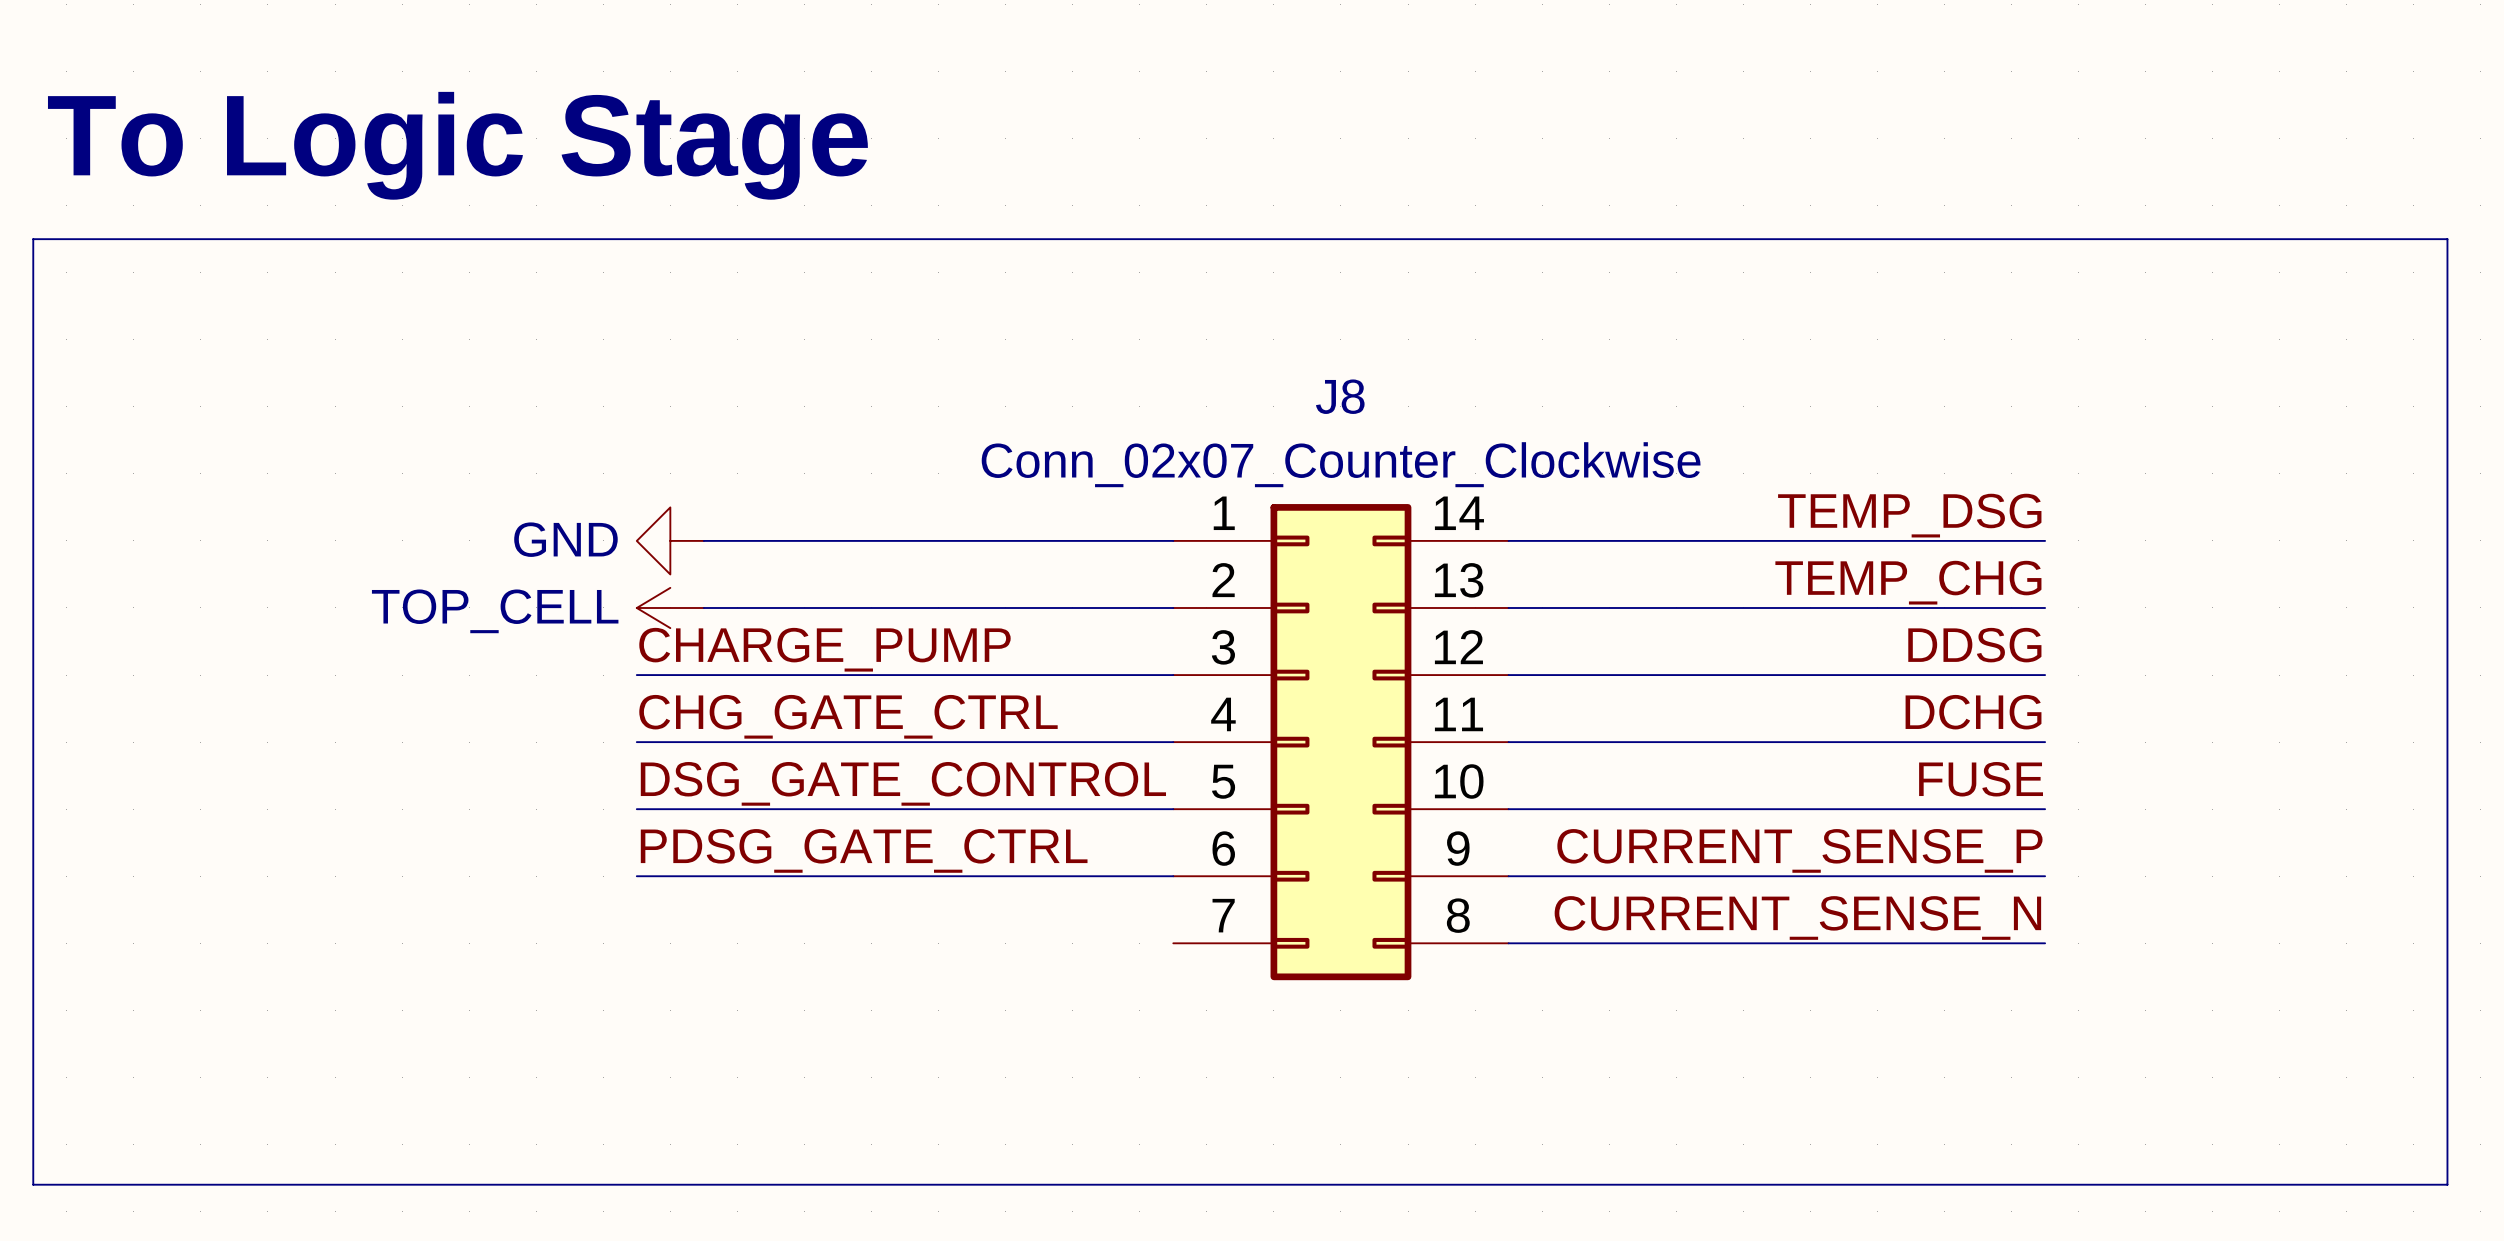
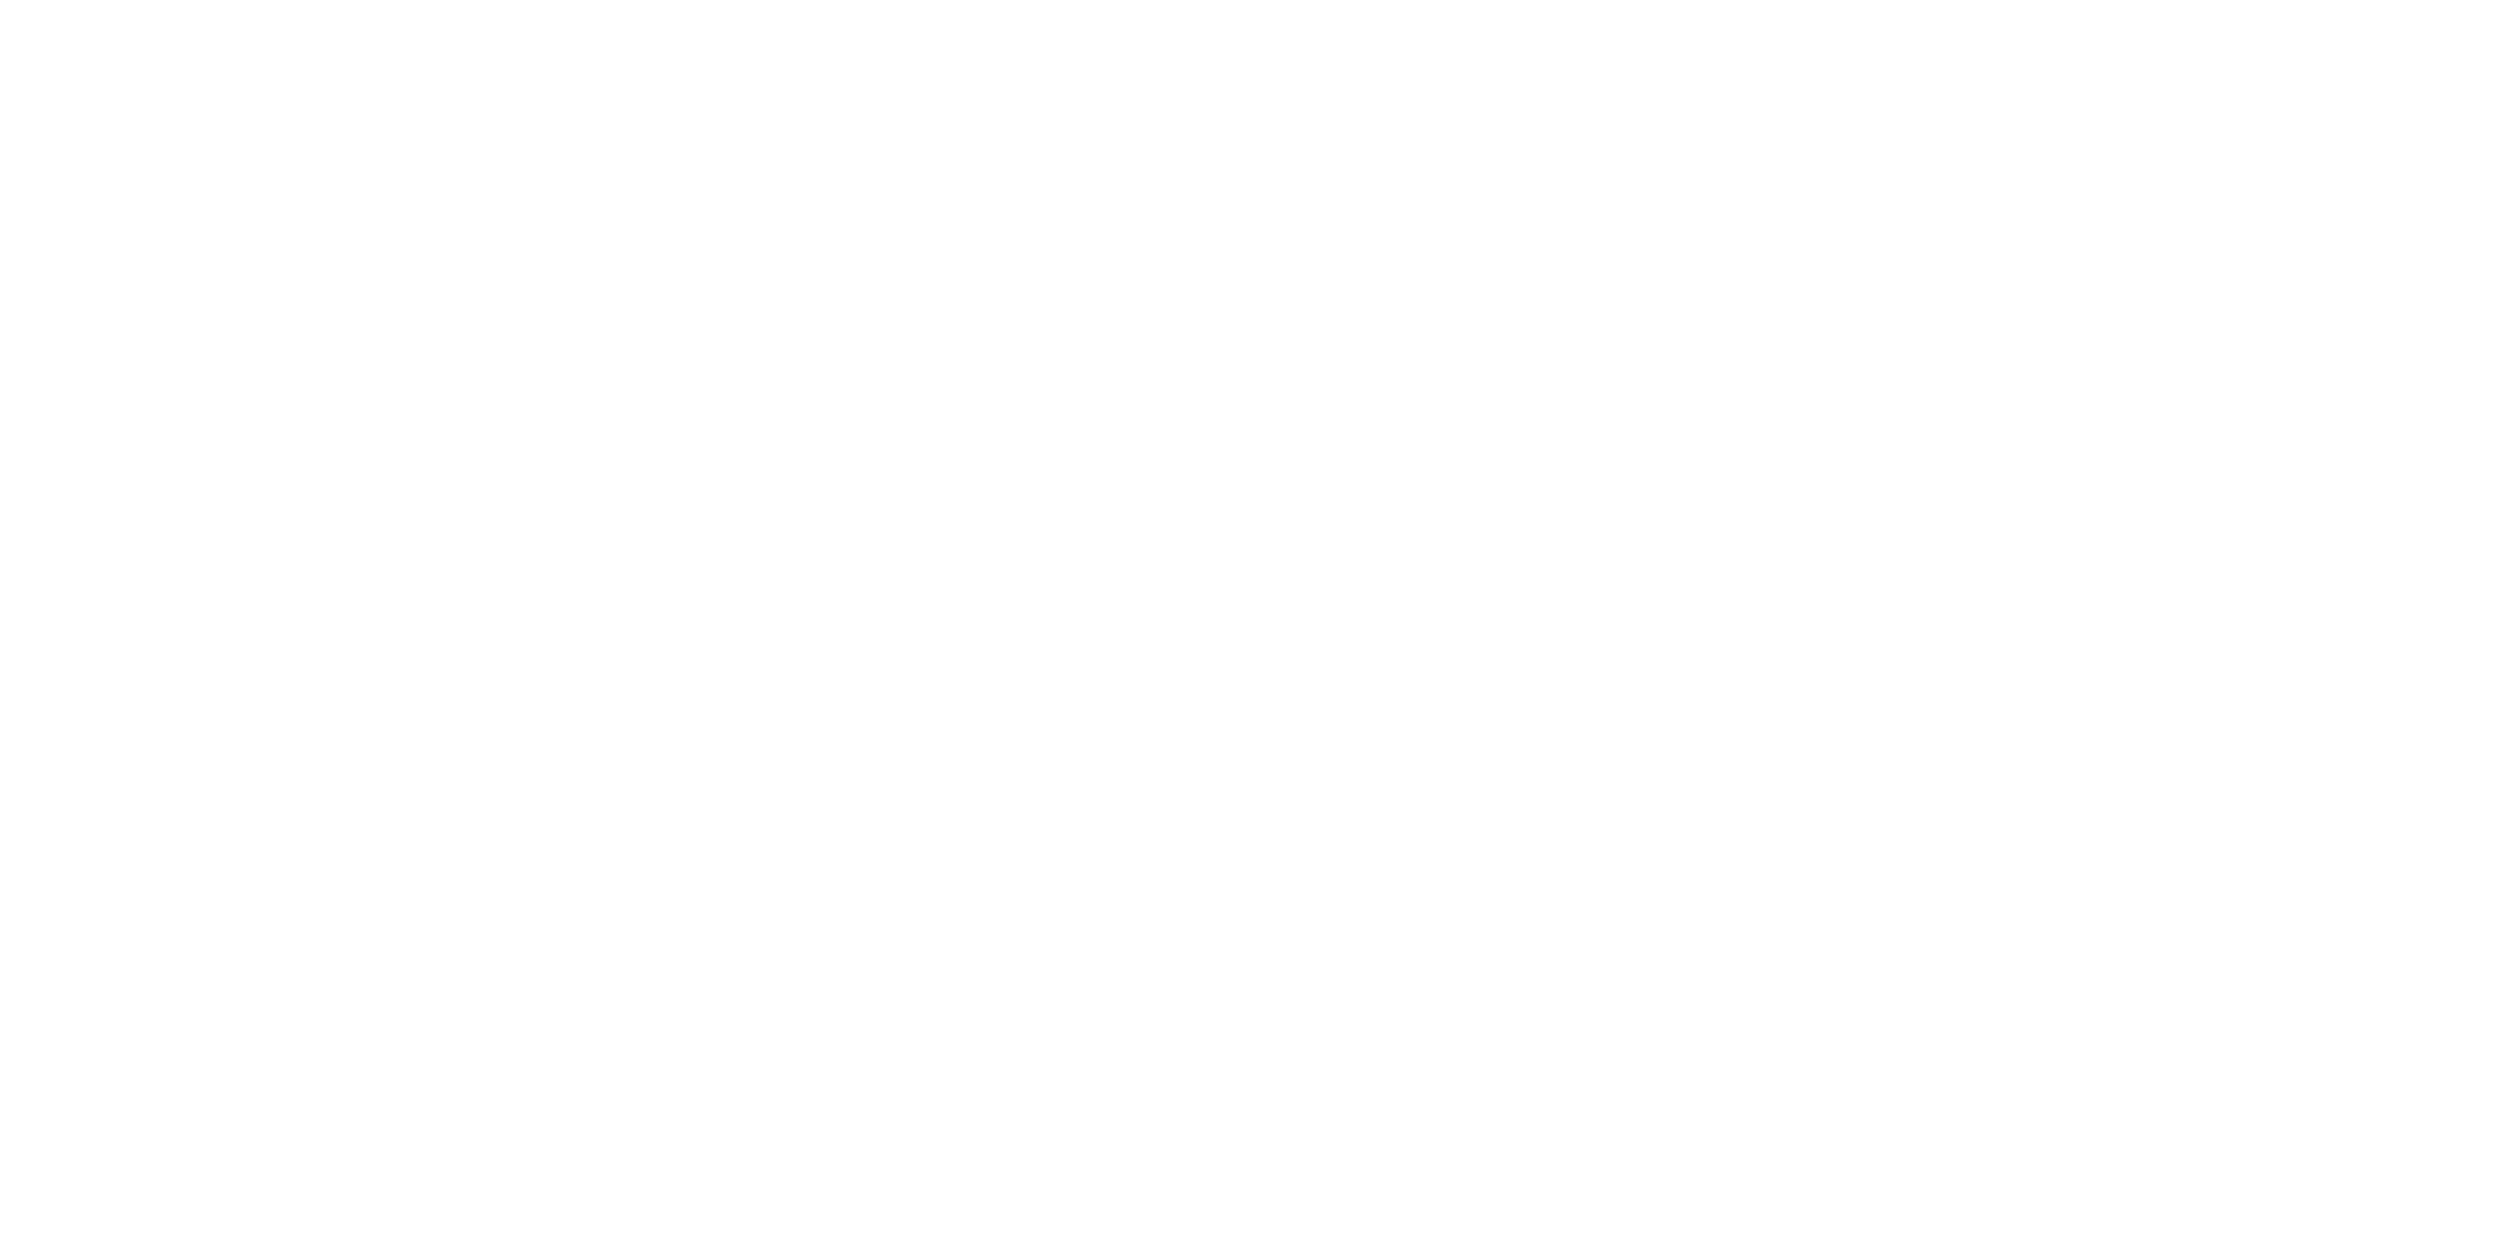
text: To Logic Stage (457, 145) -> none
line: (33, 239) (2447, 239) (2447, 1184) (33, 1184) (33, 239) -> none
label: TEMP_DSG (1909, 515) -> none
power symbol: GND (670, 540) -> none
wire: (703, 540) (1173, 540) -> none
wire: (1508, 540) (2045, 540) -> none
label: TEMP_CHG (1908, 582) -> none
power symbol: TOP_CELL (670, 607) -> none
wire: (703, 607) (1173, 607) -> none
wire: (1508, 607) (2045, 607) -> none
label: DDSG (1974, 645) -> none
label: CHARGE_PUMP (824, 649) -> none
wire: (636, 675) (1173, 675) -> none
wire: (1508, 675) (2045, 675) -> none
label: DCHG (1973, 712) -> none
label: CHG_GATE_CTRL (848, 716) -> none
wire: (636, 742) (1173, 742) -> none
J8: Conn_02x07_Counter_Clockwise (1340, 742) -> none
wire: (1508, 742) (2045, 742) -> none
label: FUSE (1981, 779) -> none
label: DSG_GATE_CONTROL (903, 783) -> none
wire: (636, 809) (1173, 809) -> none
wire: (1508, 809) (2045, 809) -> none
label: PDSG_GATE_CTRL (864, 850) -> none
label: CURRENT_SENSE_P (1799, 850) -> none
wire: (636, 876) (1173, 876) -> none
wire: (1508, 876) (2045, 876) -> none
label: CURRENT_SENSE_N (1797, 917) -> none
wire: (1508, 943) (2045, 943) -> none

